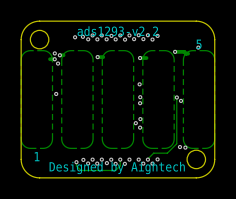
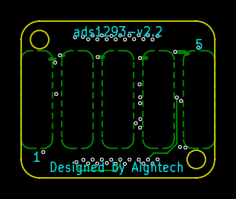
via: (54, 53) -> none
via: (54, 59) -> none
via: none -> (55, 62)
via: (58, 63) -> none
via: none -> (43, 152)

